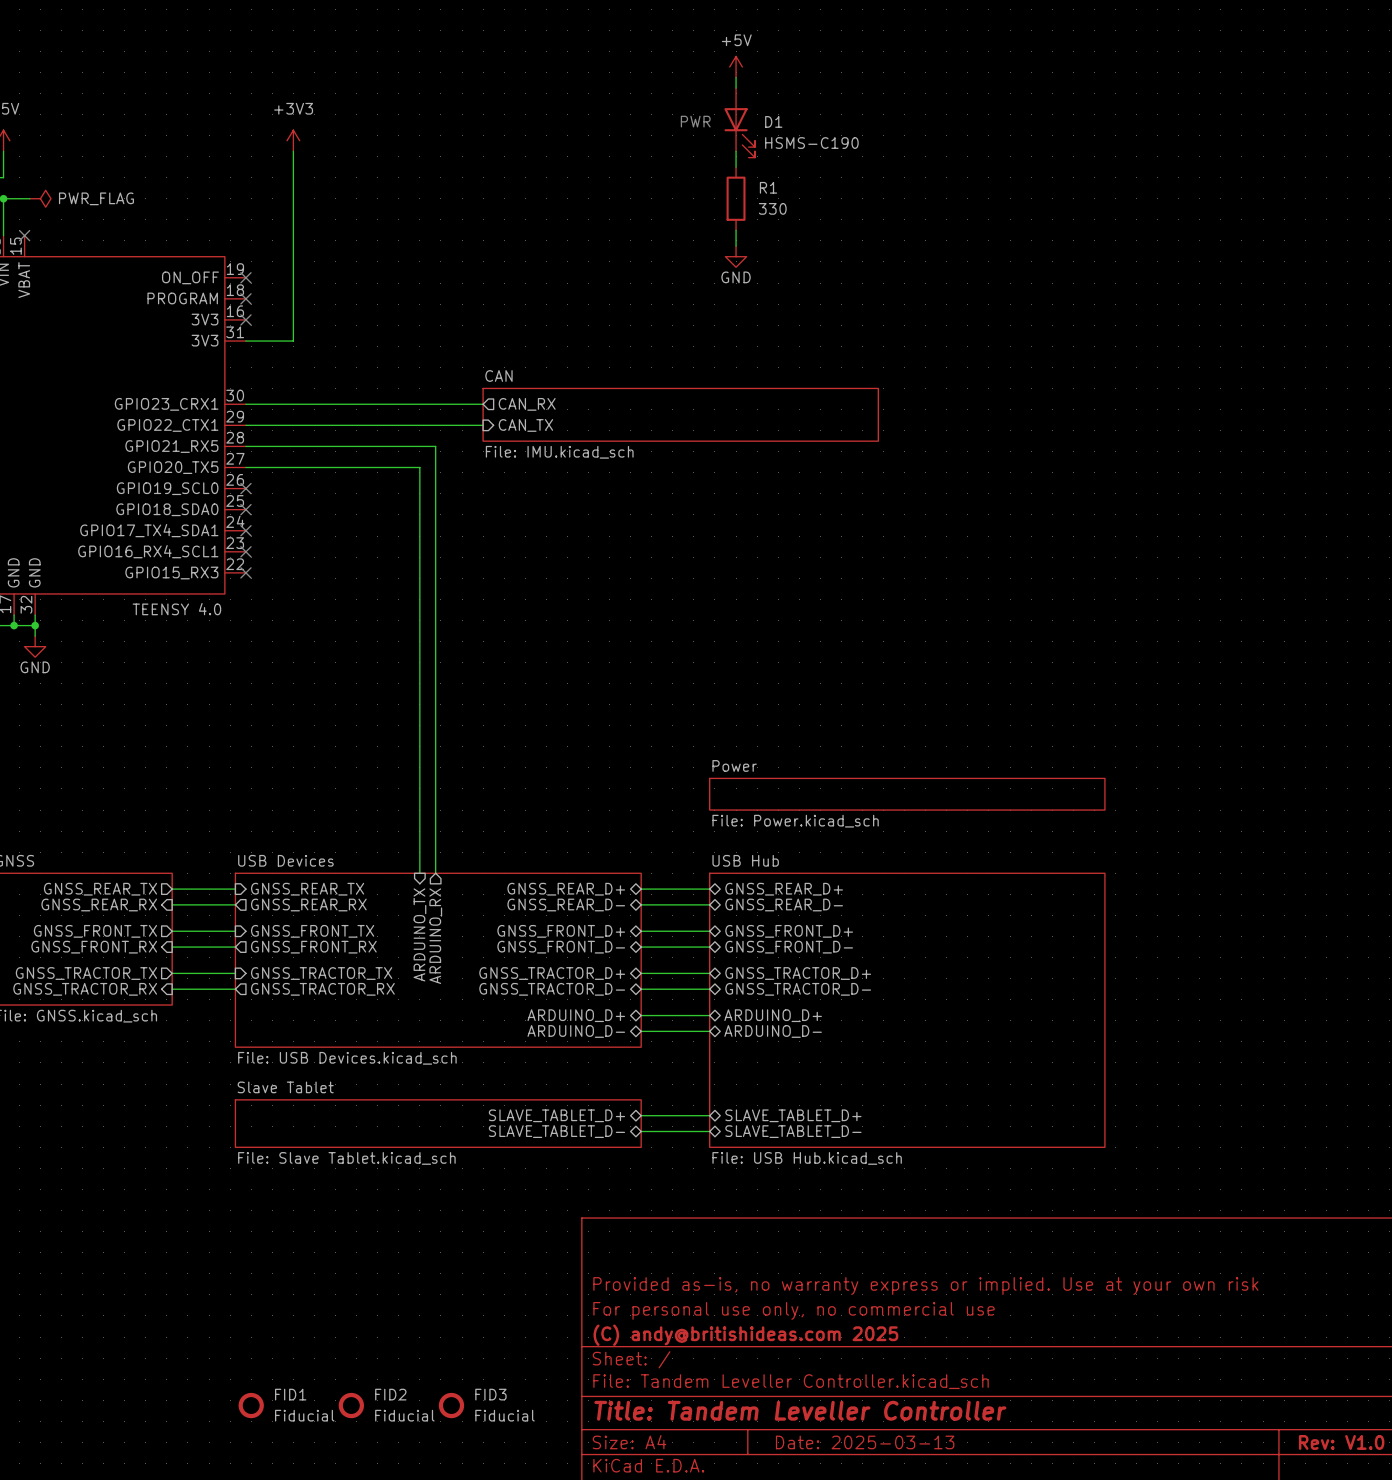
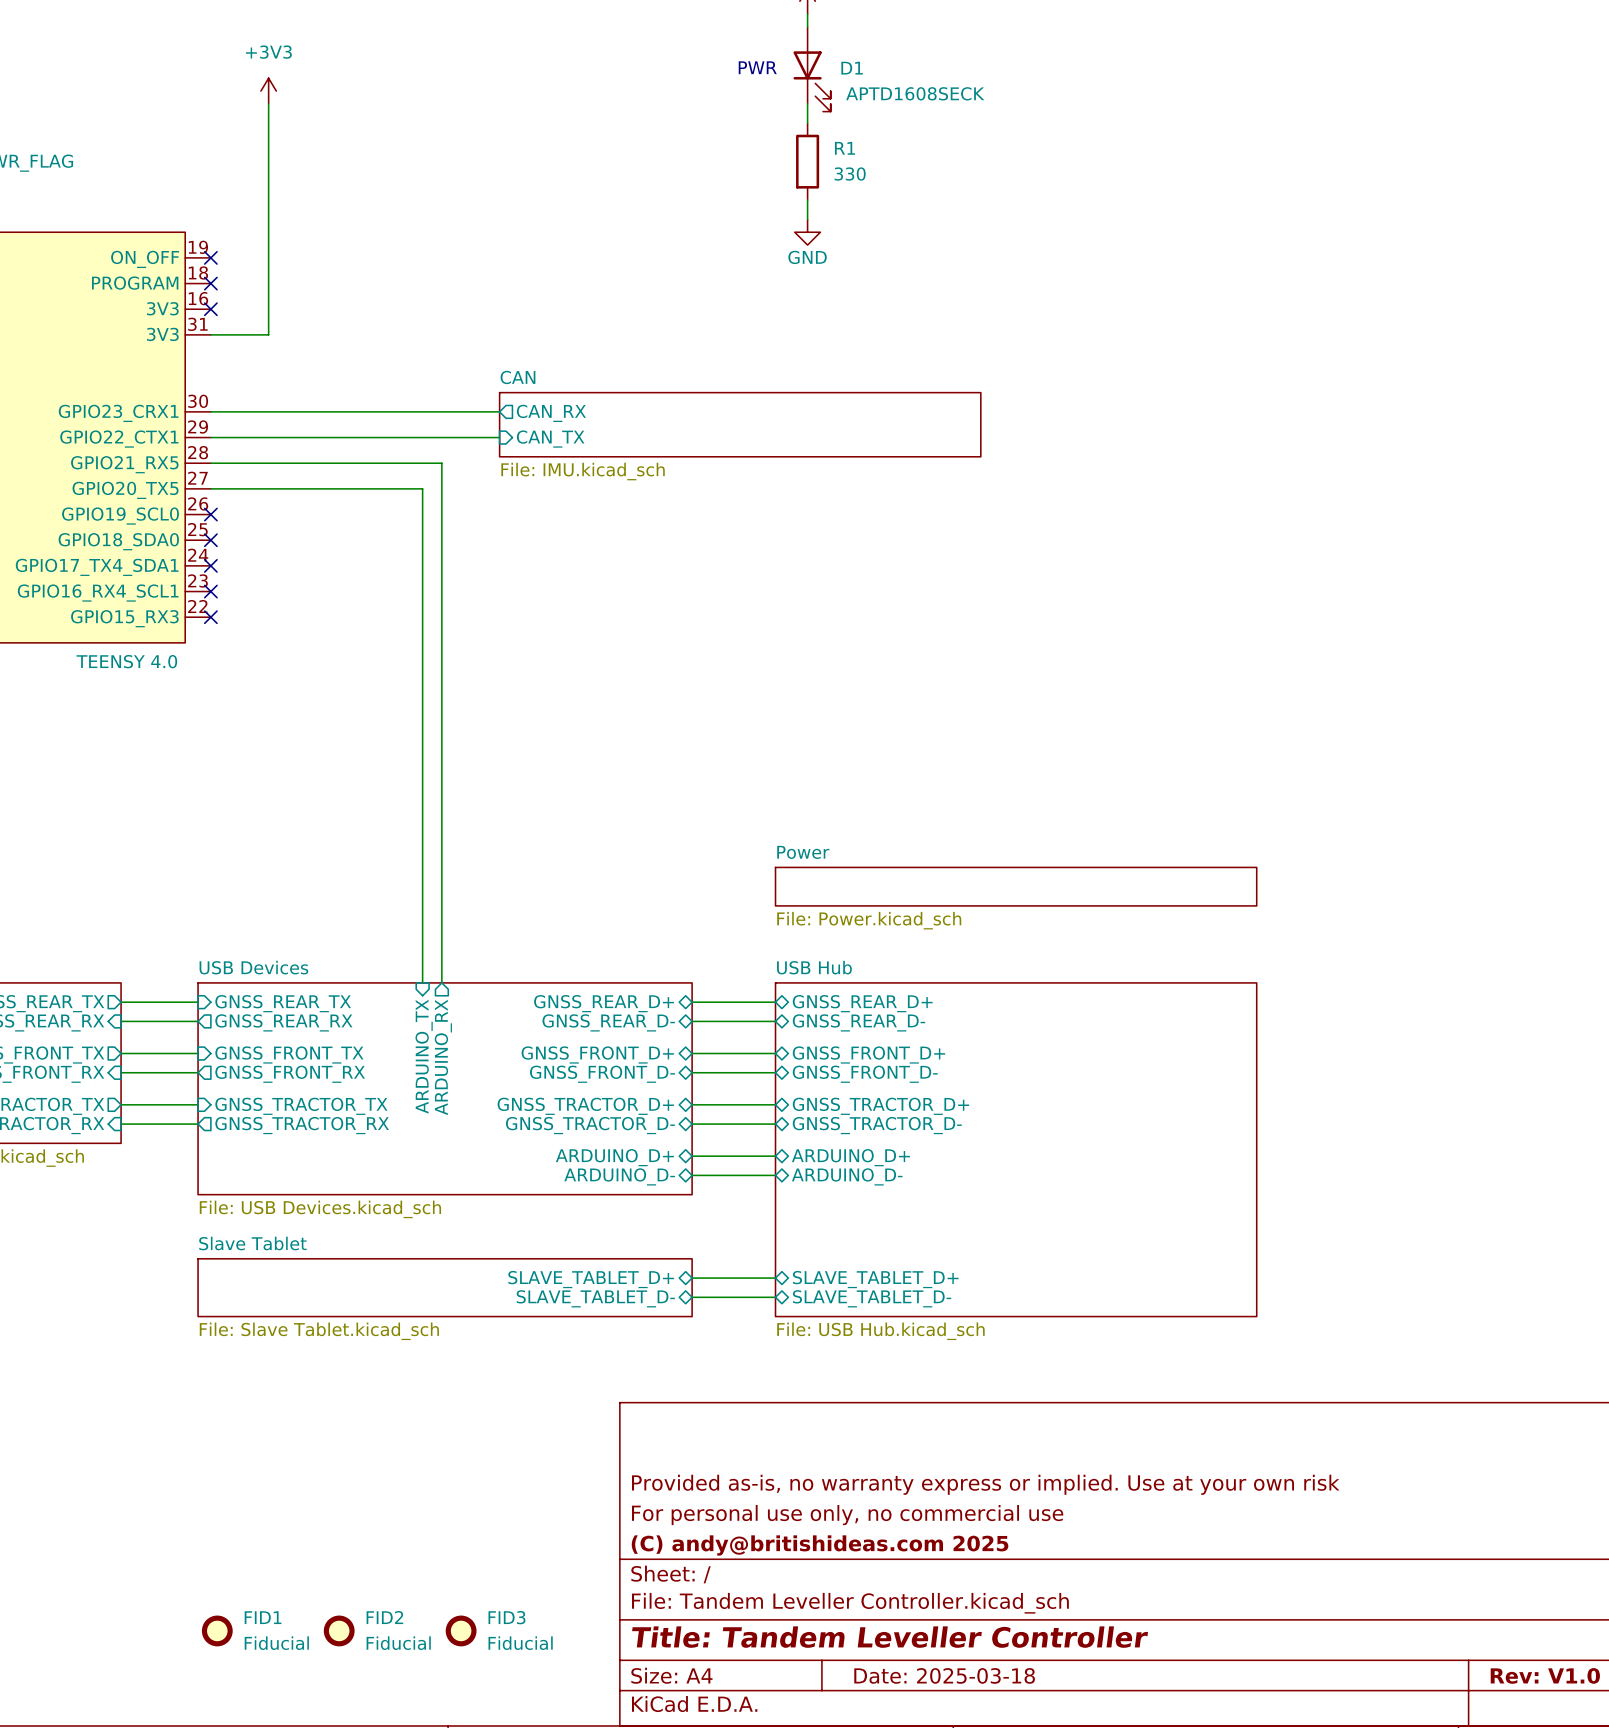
D1 value: HSMS-C190 (811, 143) -> APTD1608SECK (915, 93)
title block: Date: 2025-03-13 (865, 1442) -> Date: 2025-03-18 (944, 1675)

